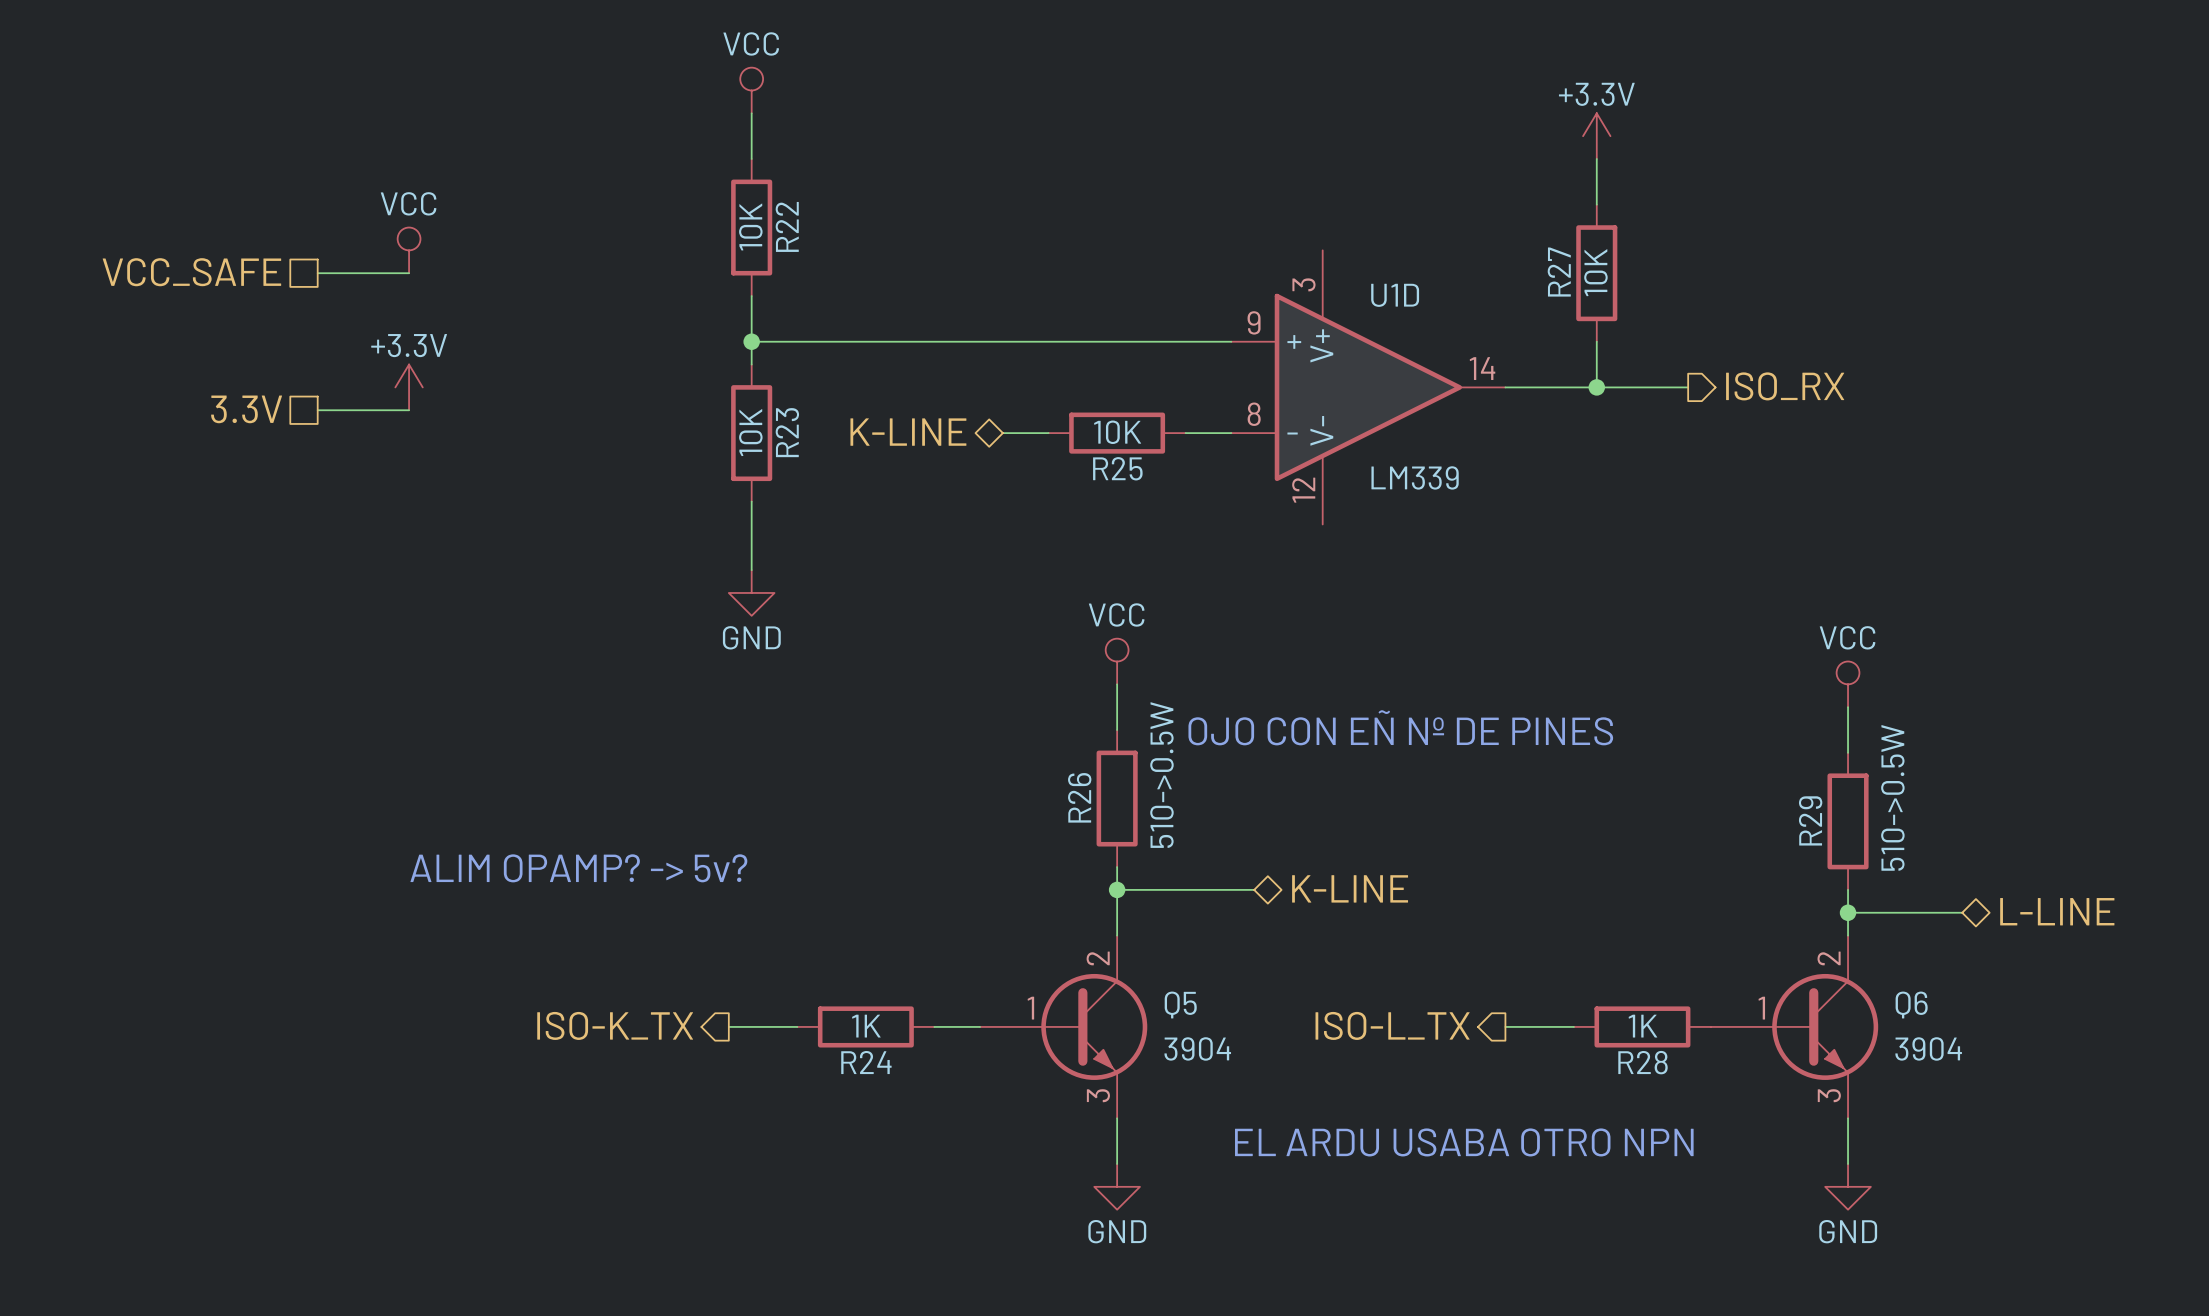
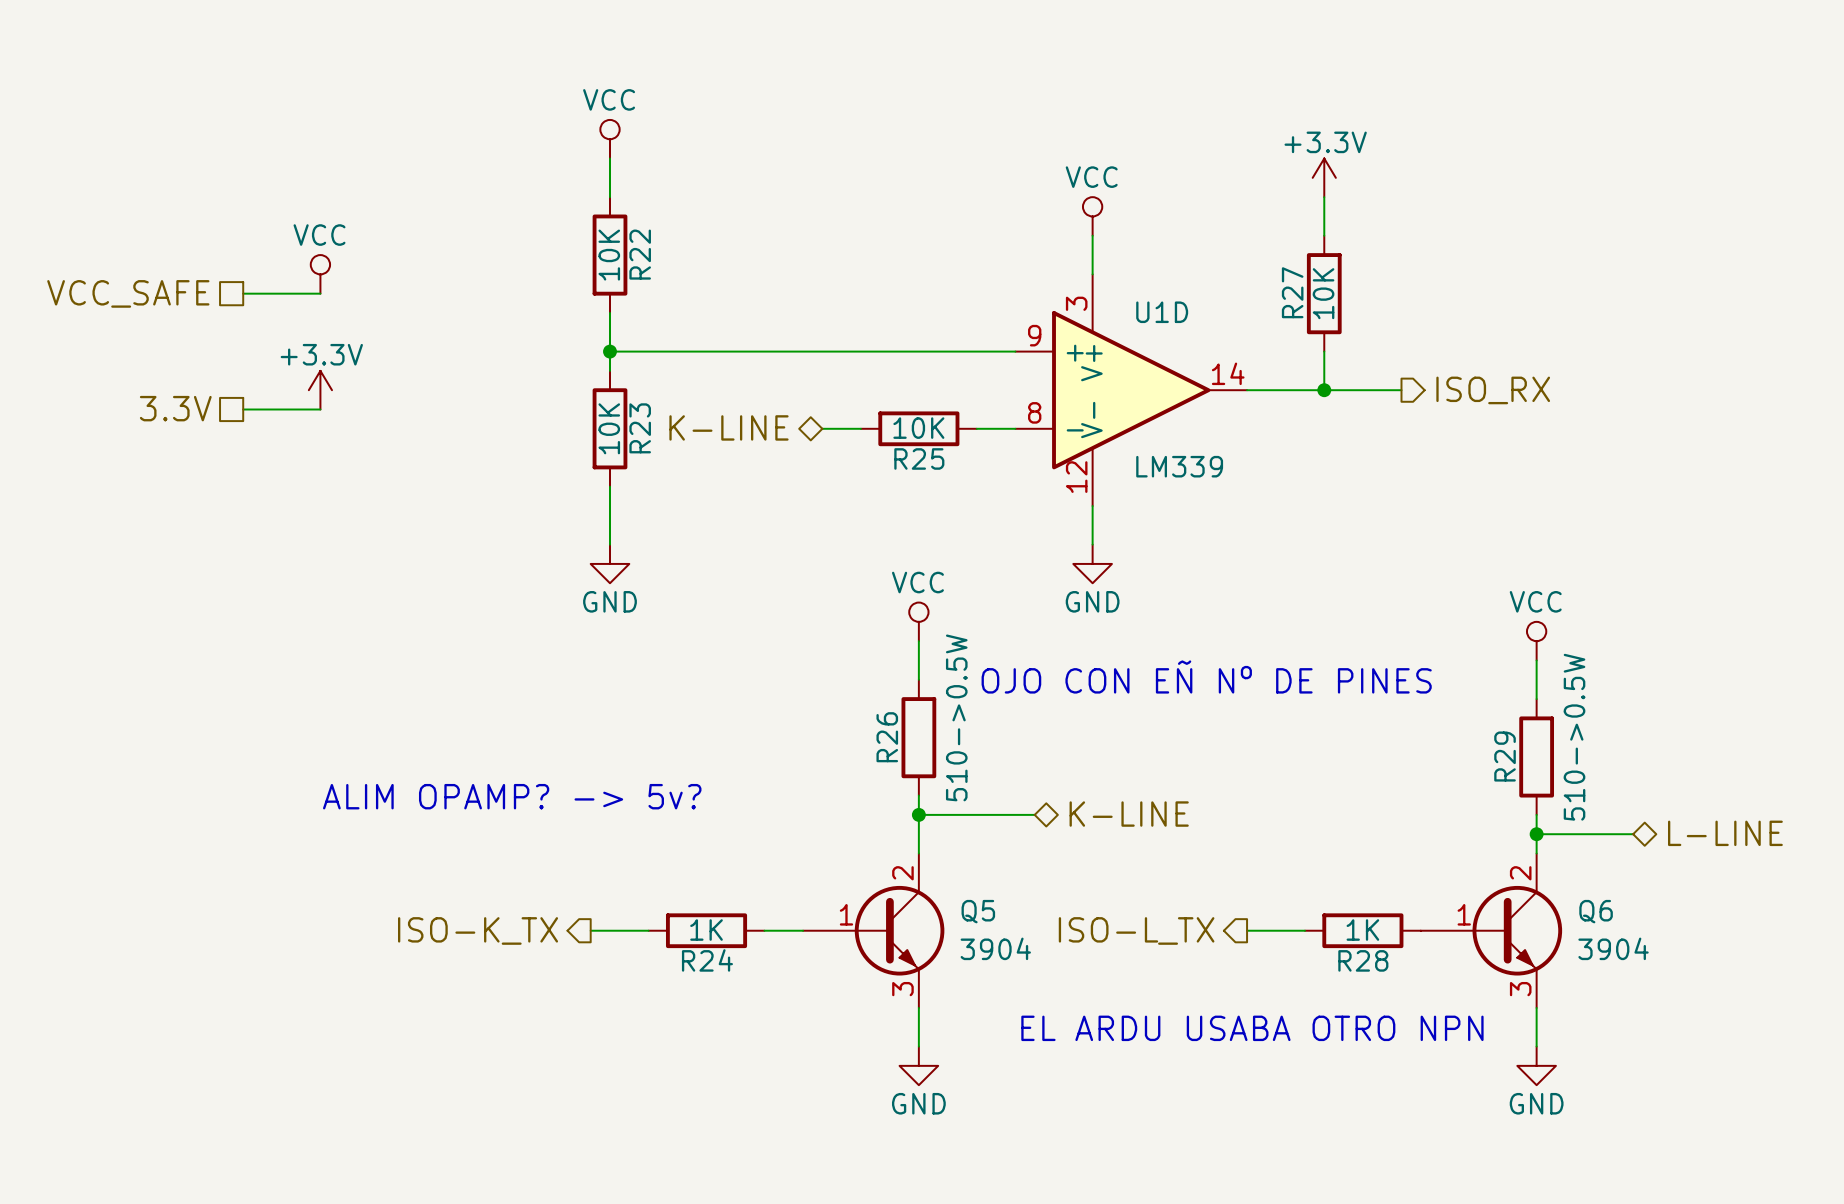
power symbol: none -> VCC (1092, 216)
wire: none -> (1092, 235) (1092, 274)
wire: none -> (1092, 506) (1092, 544)
power symbol: none -> GND (1092, 563)

